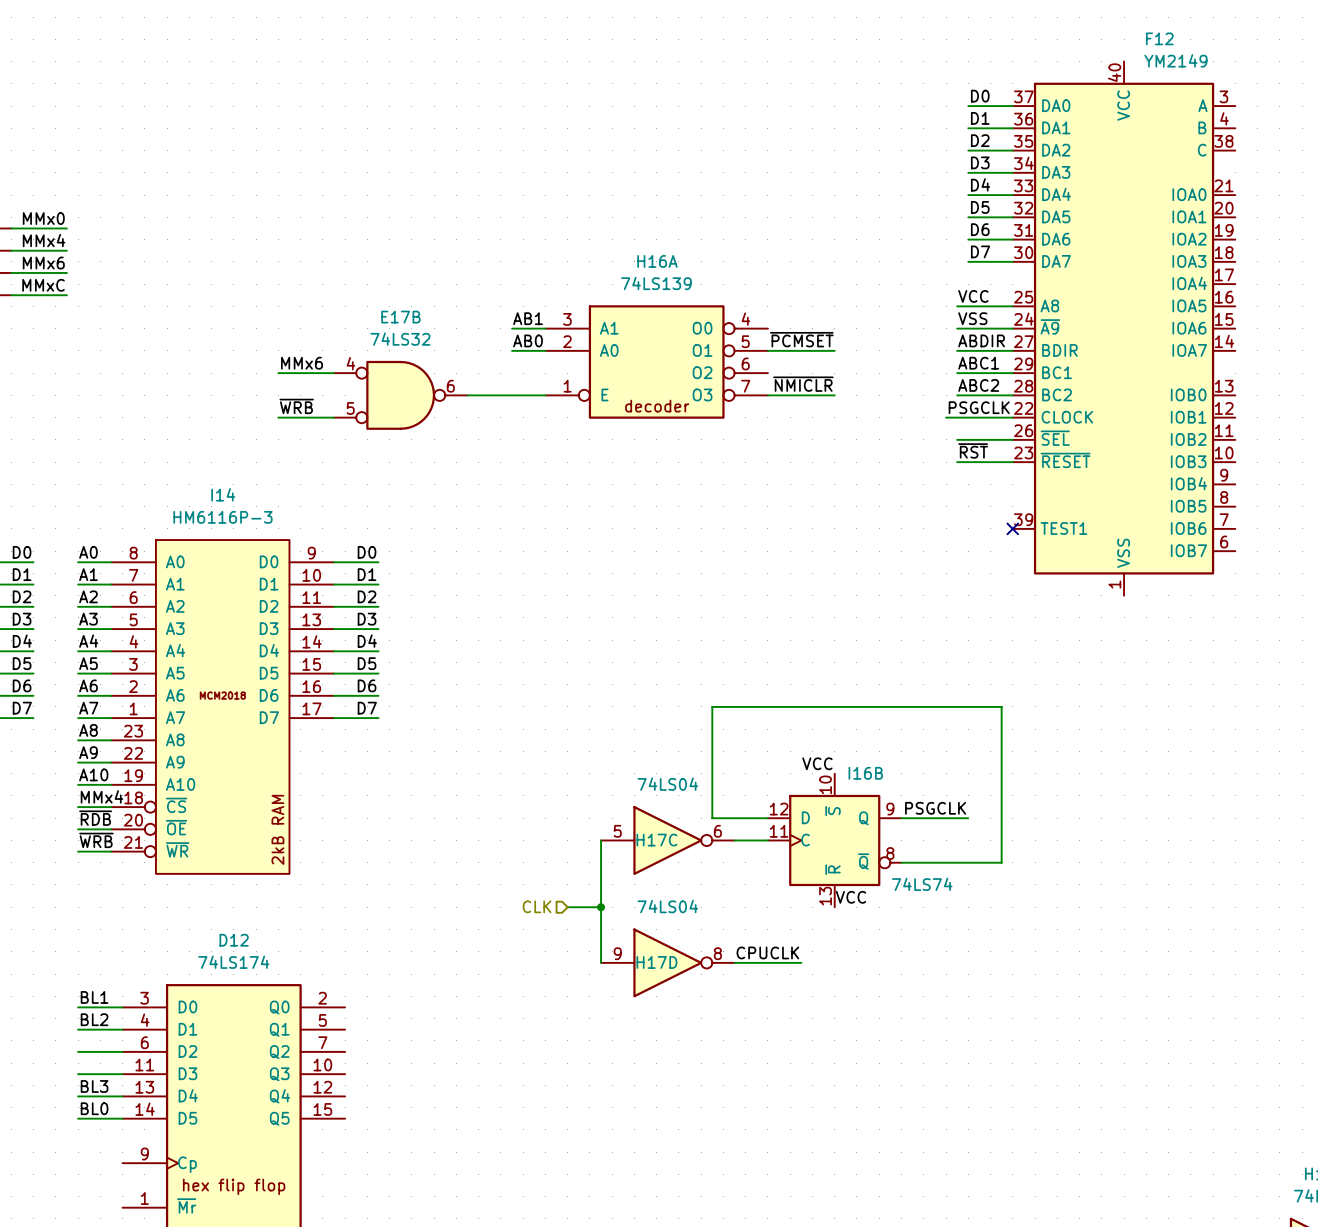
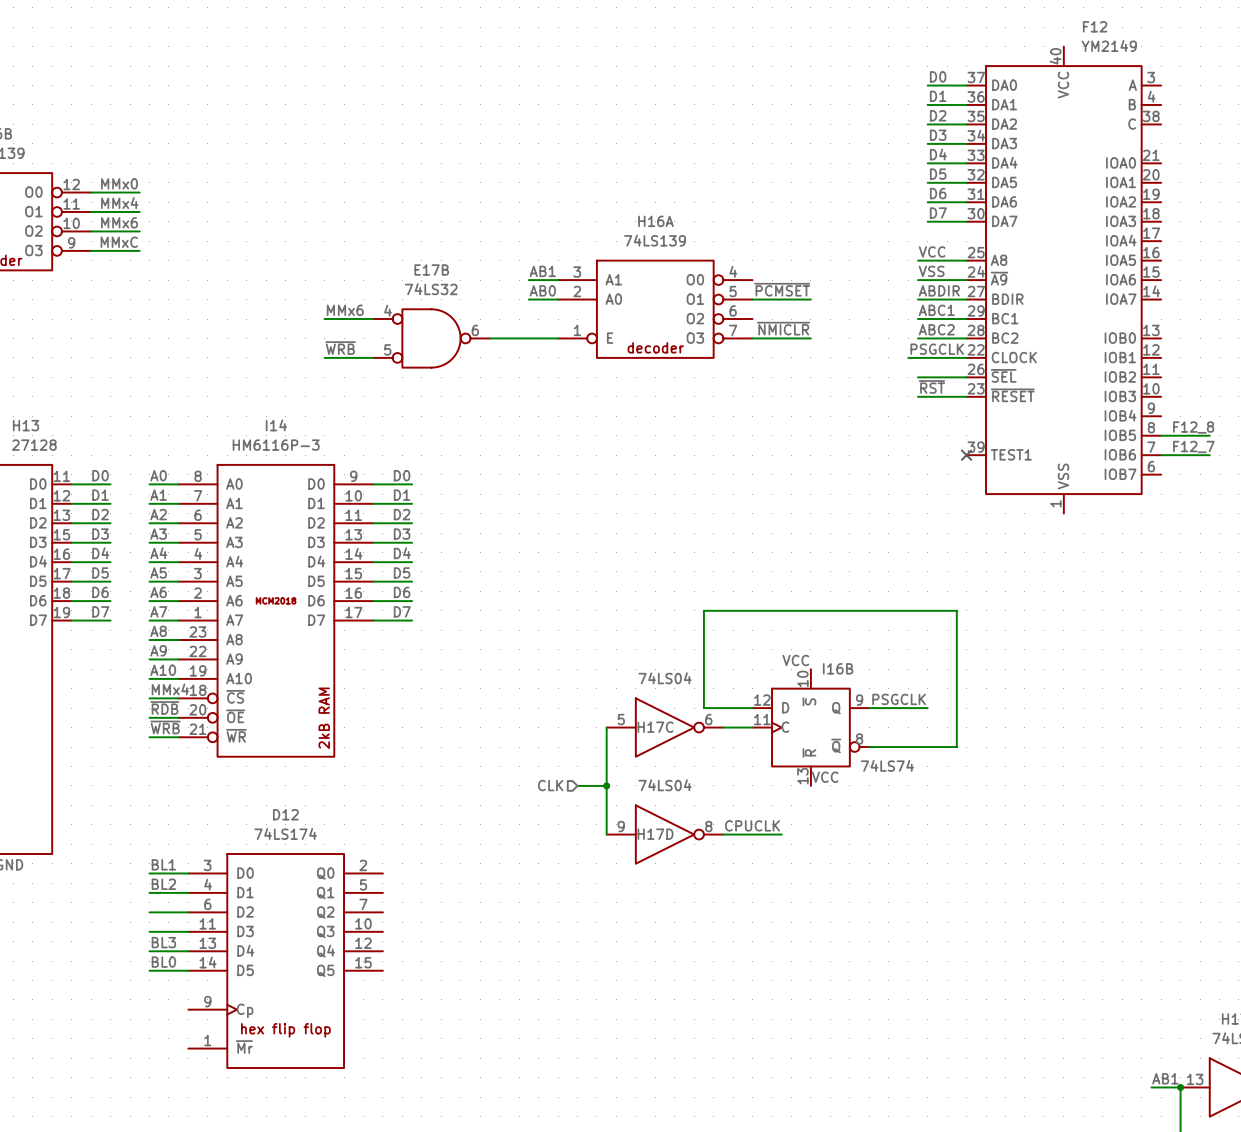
label: none -> F12_8 (1193, 427)
wire: none -> (1161, 435) (1209, 435)
label: none -> F12_7 (1193, 446)
wire: none -> (1161, 455) (1209, 455)

